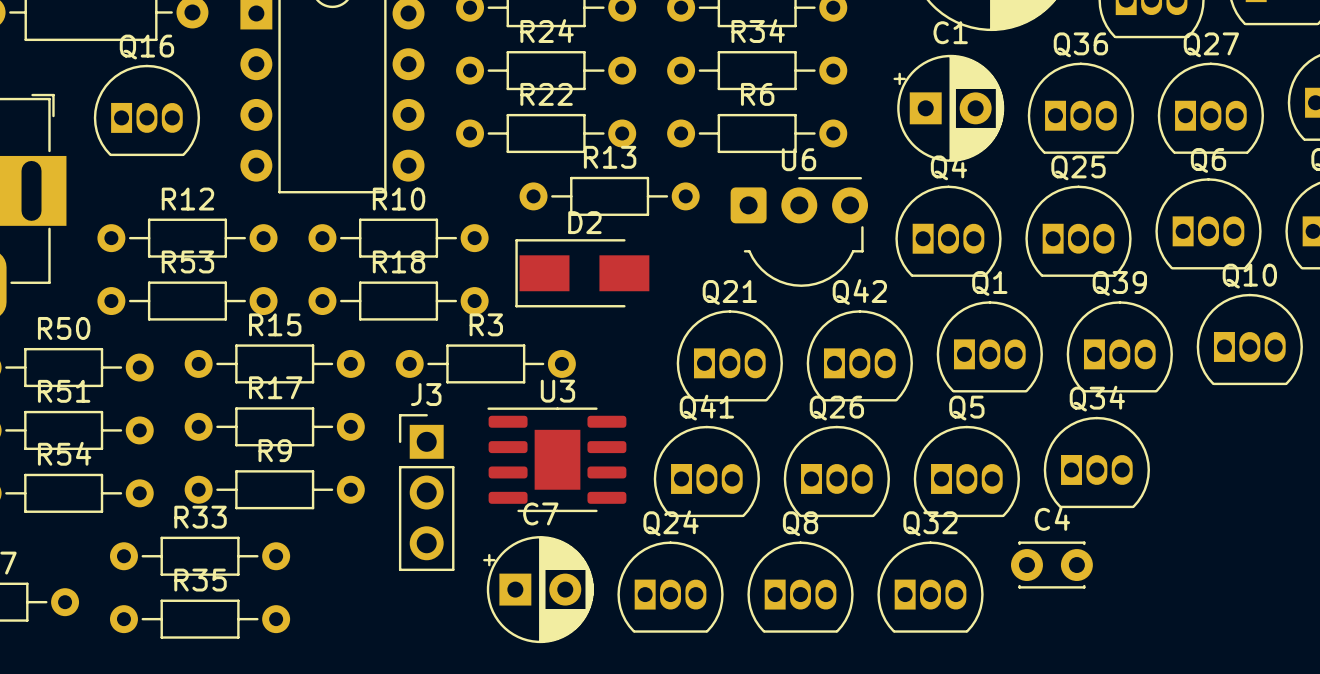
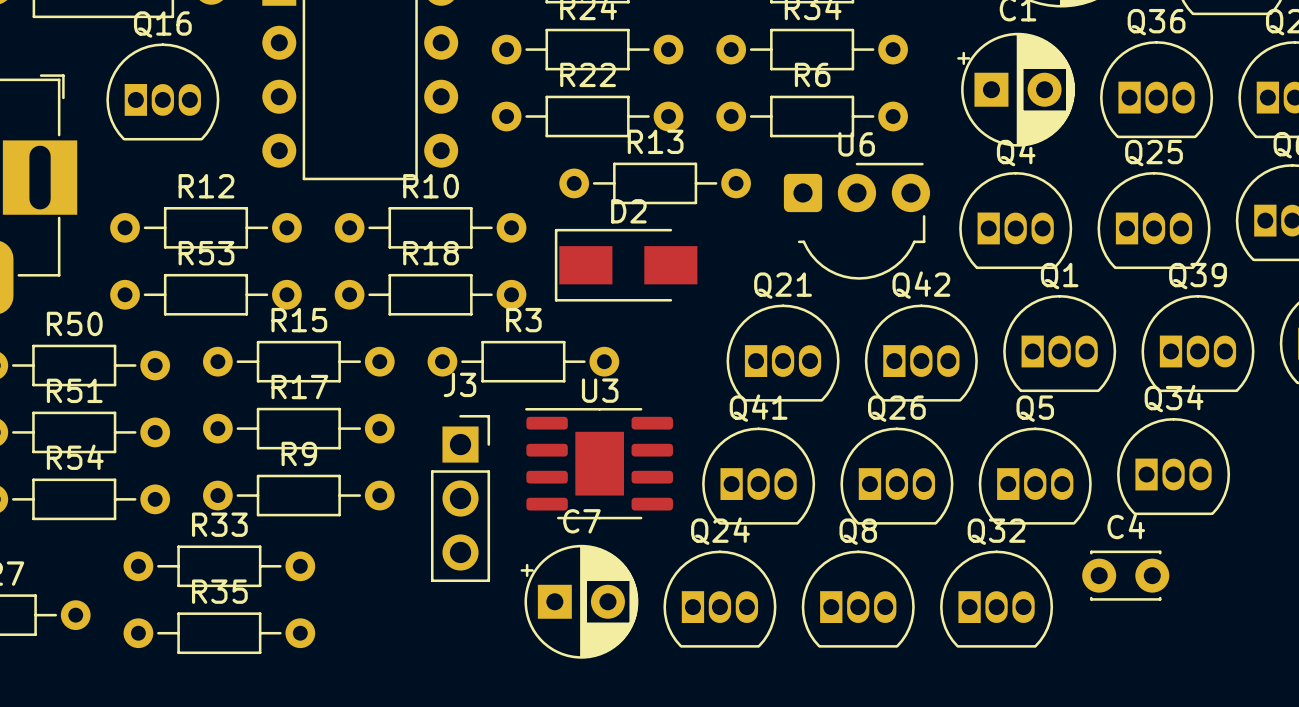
J3 footprint: [398, 414, 455, 572] -> [430, 415, 491, 583]

